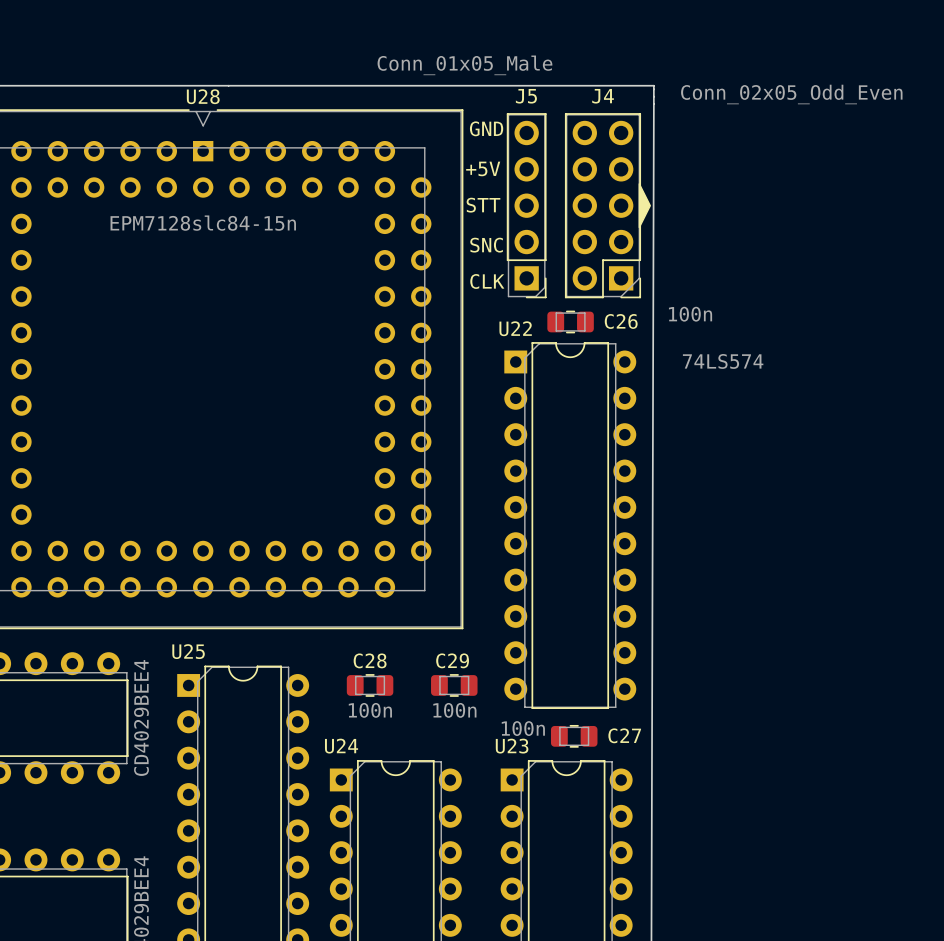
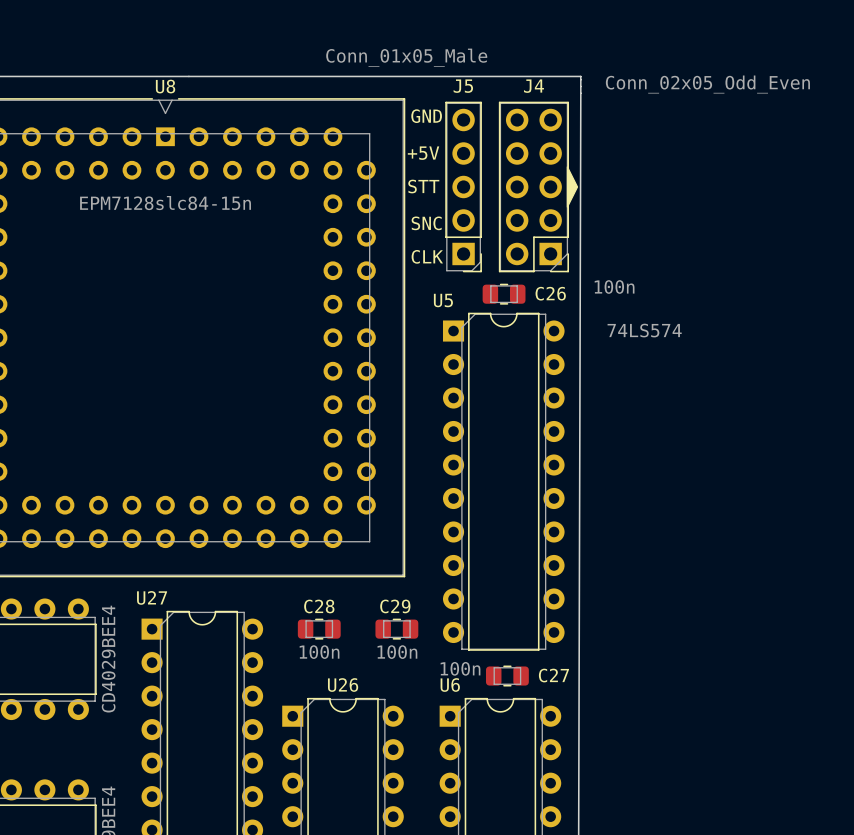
U28 name: U28 (203, 96) -> U8 (165, 86)
U22 name: U22 (515, 328) -> U5 (443, 300)
U25 name: U25 (188, 651) -> U27 (152, 597)
U24 name: U24 (341, 746) -> U26 (343, 685)
U23 name: U23 (512, 746) -> U6 (450, 685)

